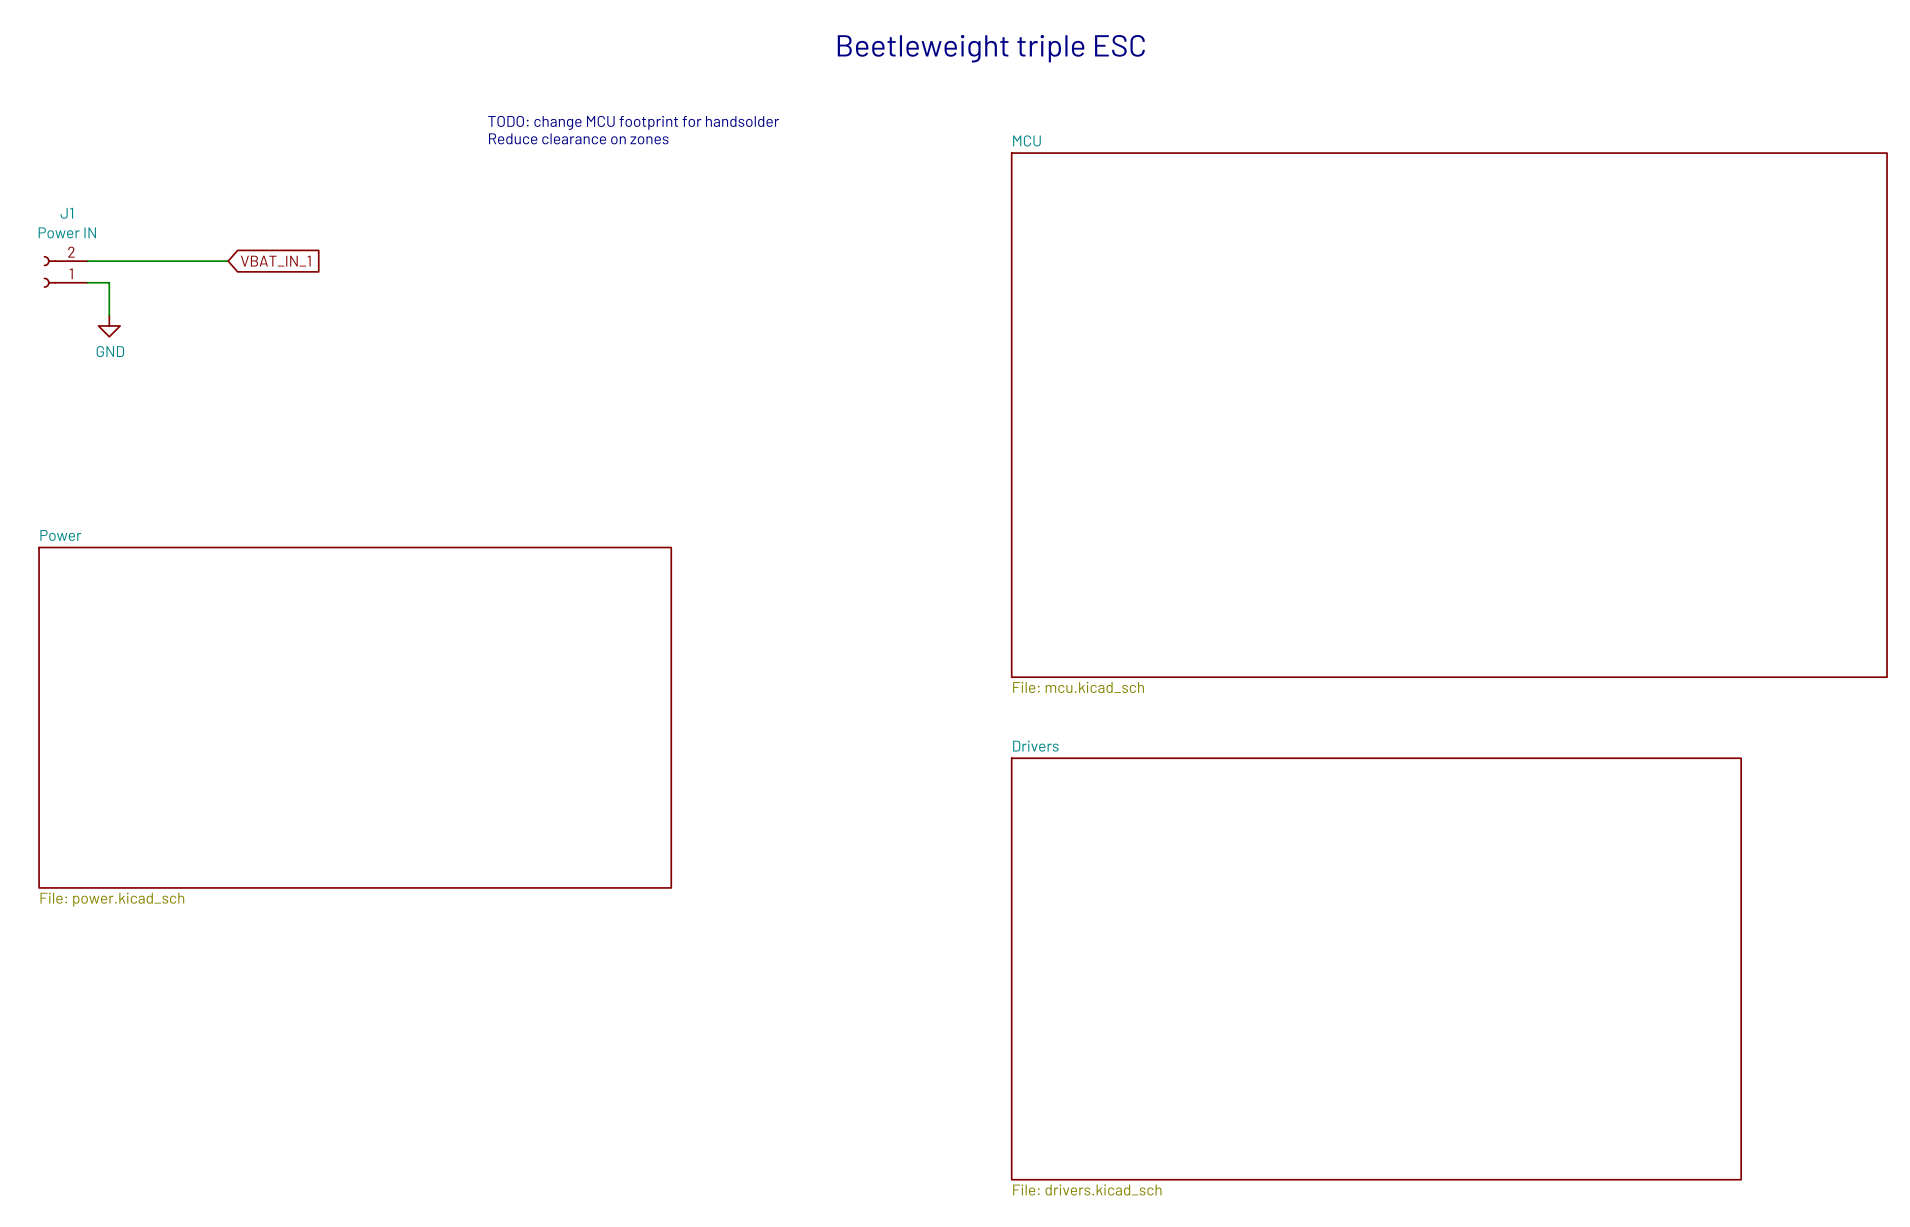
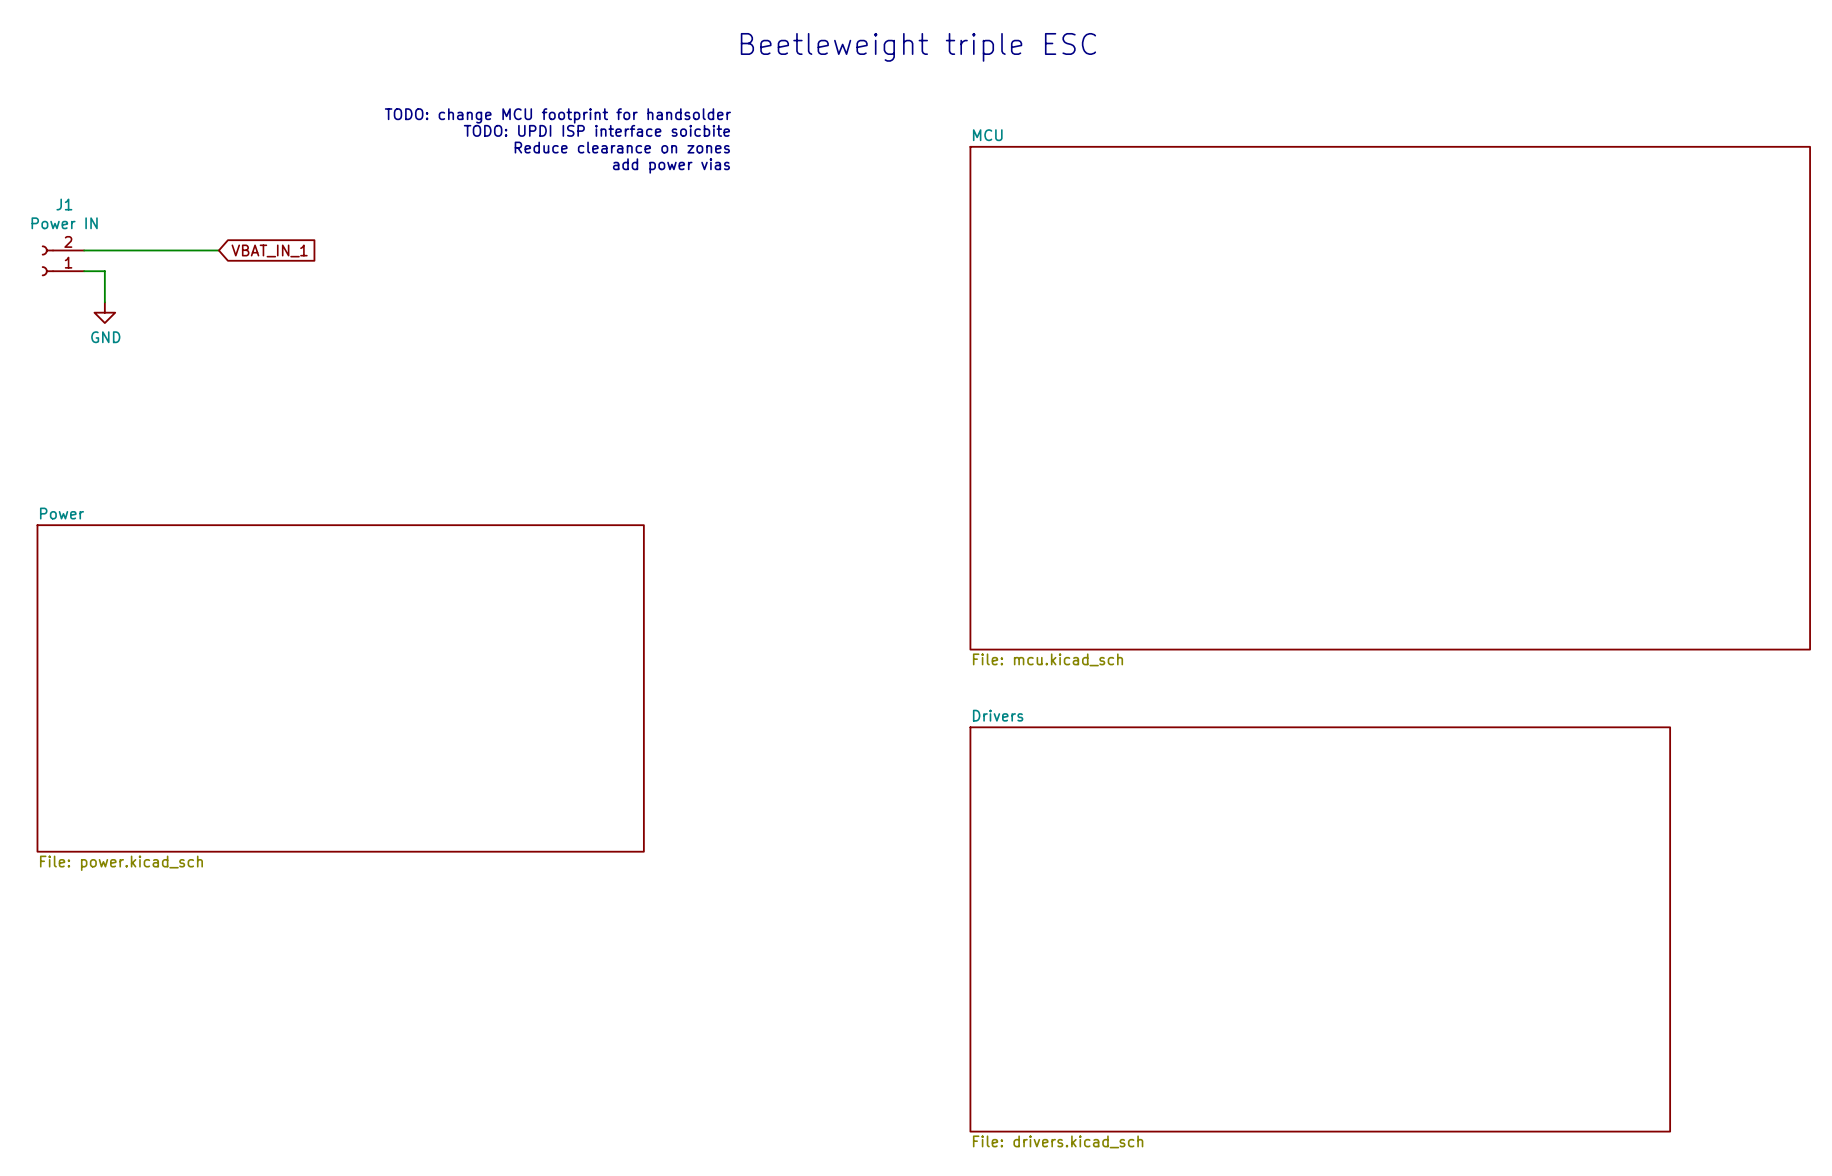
text: none -> TODO: change MCU footprint for handsolder (557, 115)
text: TODO: change MCU footprint for handsolder (633, 122) -> none
text: none -> TODO: UPDI ISP interface soicbite (596, 130)
text: Reduce clearance on zones (578, 138) -> none
text: none -> Reduce clearance on zones (622, 147)
text: none -> add power vias (671, 165)

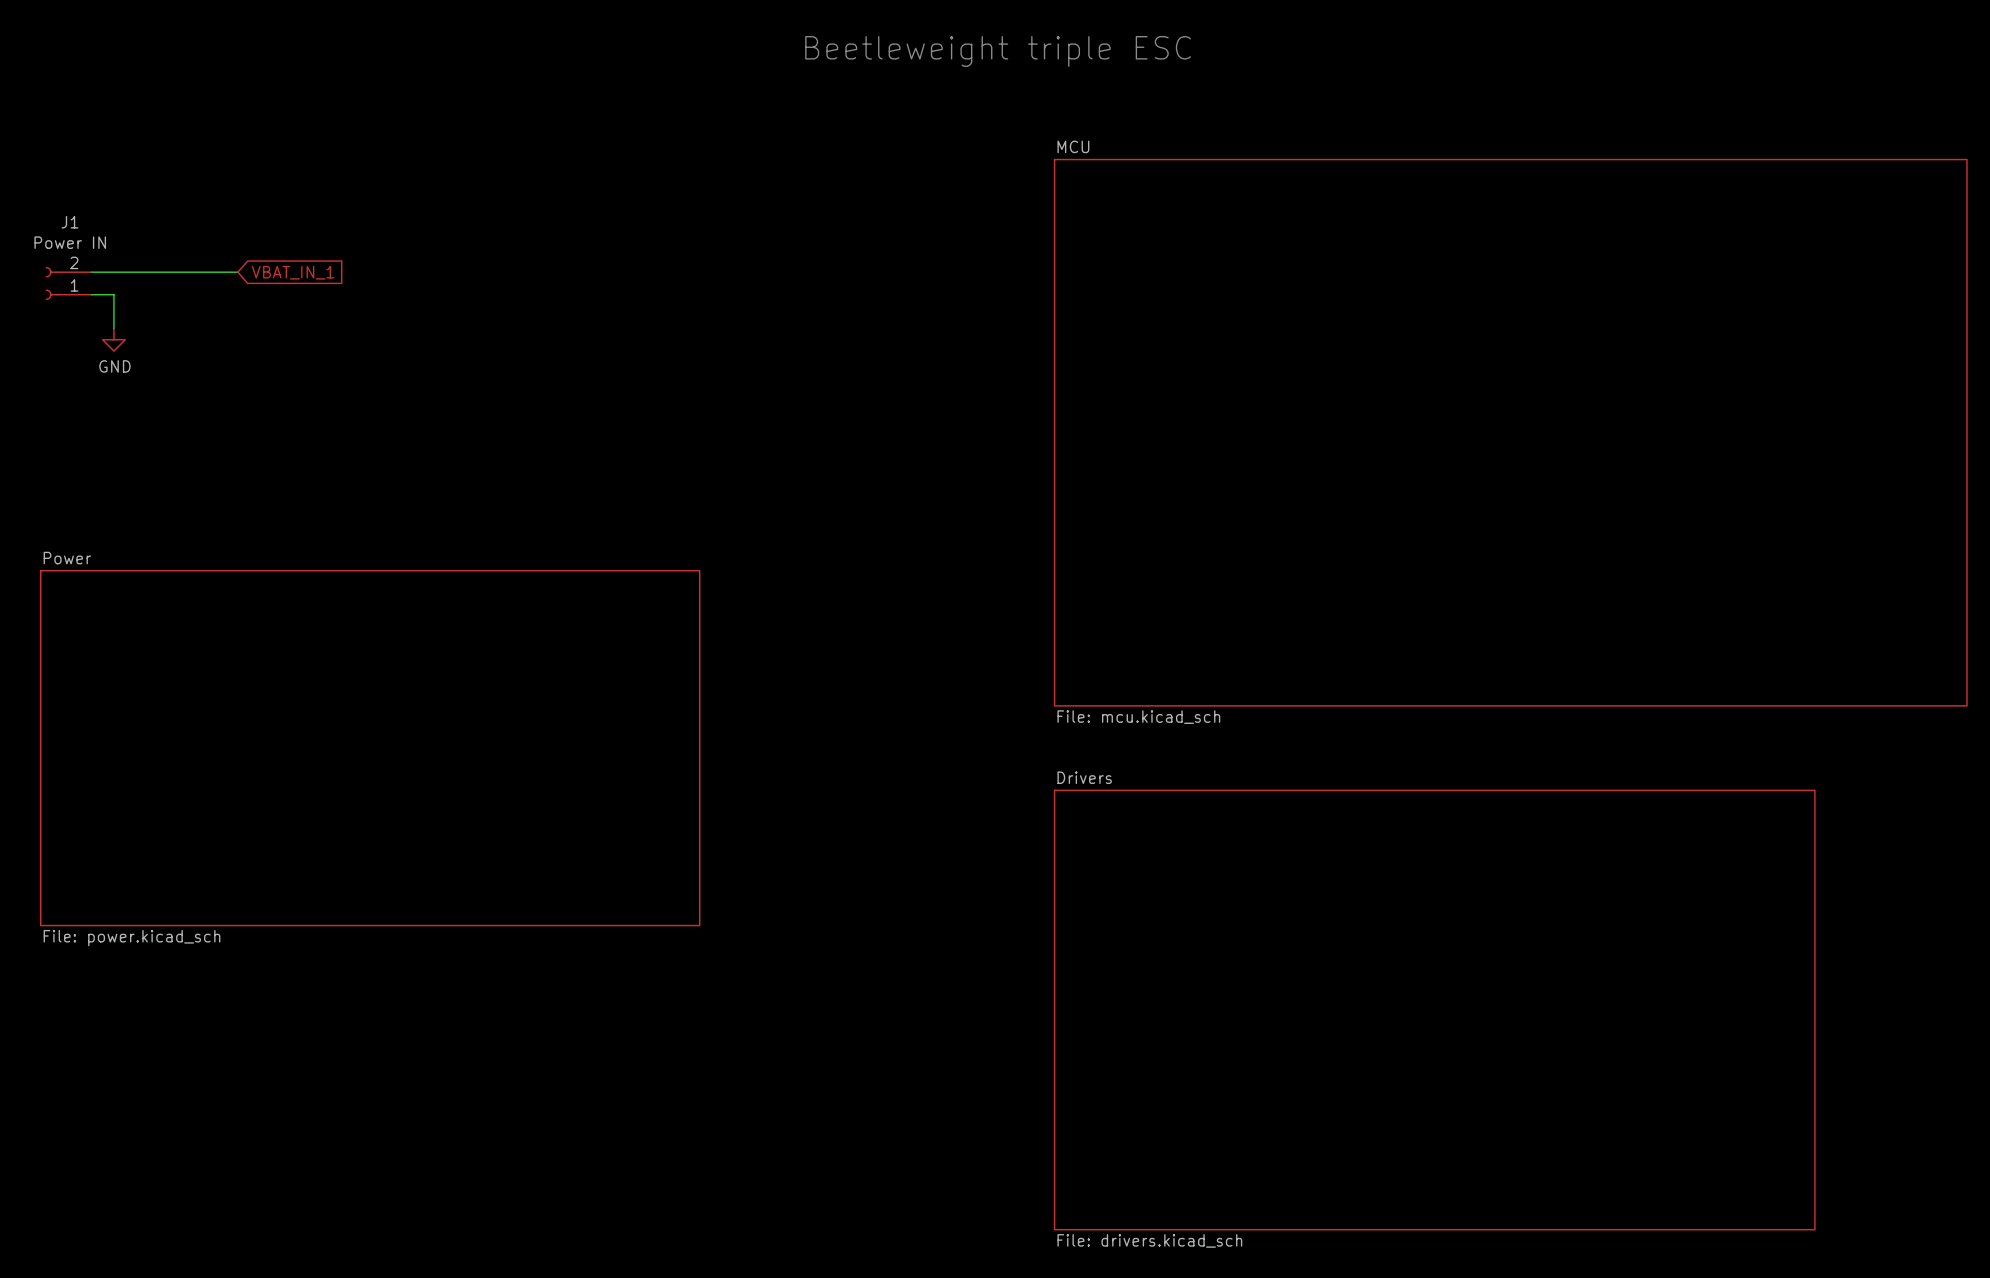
text: TODO: change MCU footprint for handsolder (557, 115) -> none
text: TODO: UPDI ISP interface soicbite (596, 130) -> none
text: Reduce clearance on zones (622, 147) -> none
text: add power vias (671, 165) -> none

